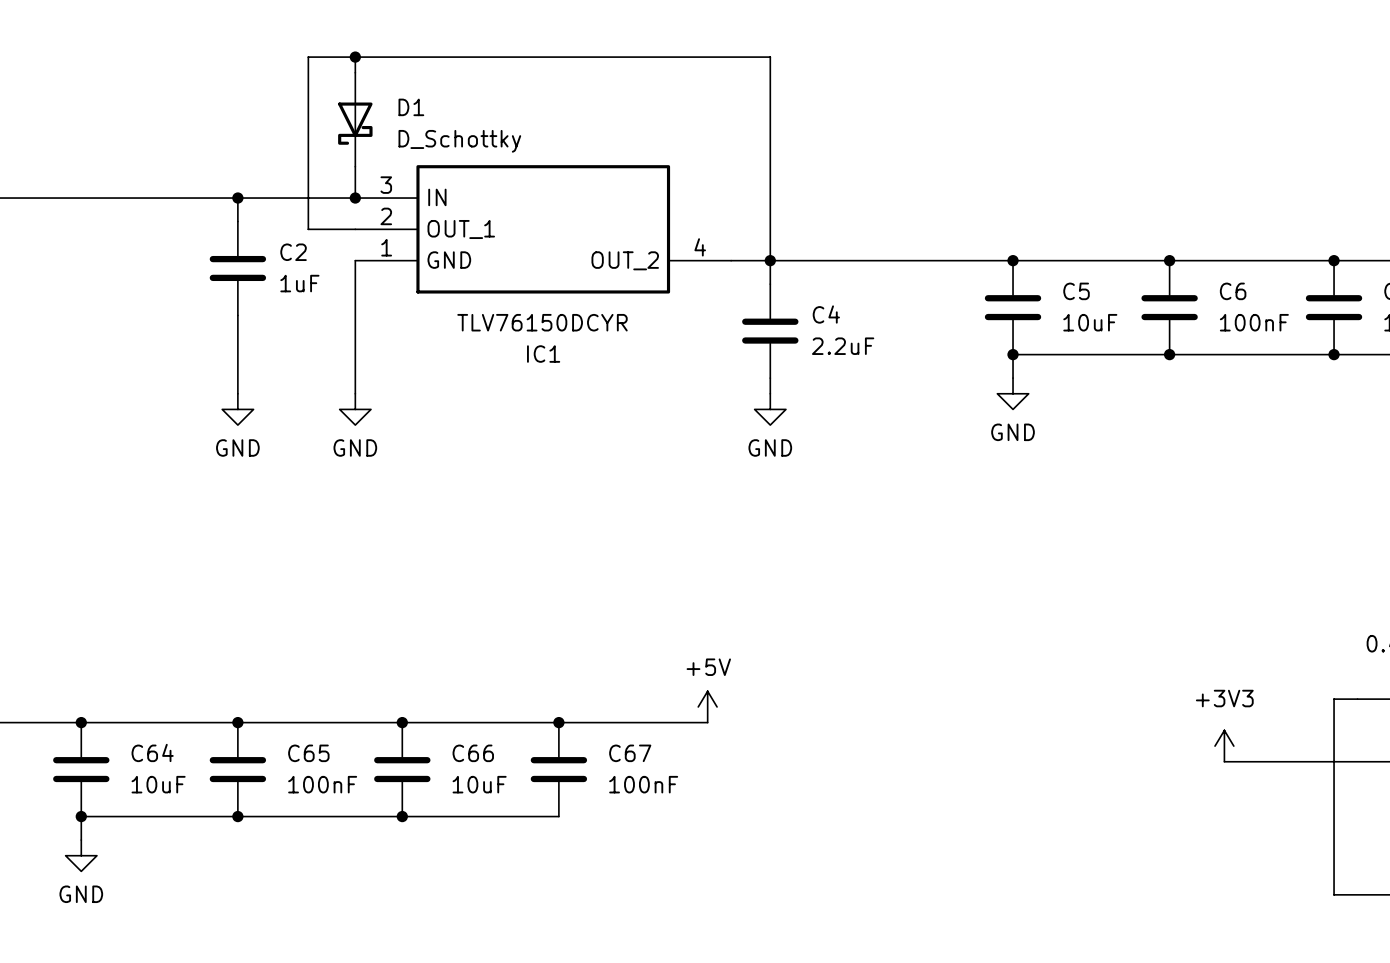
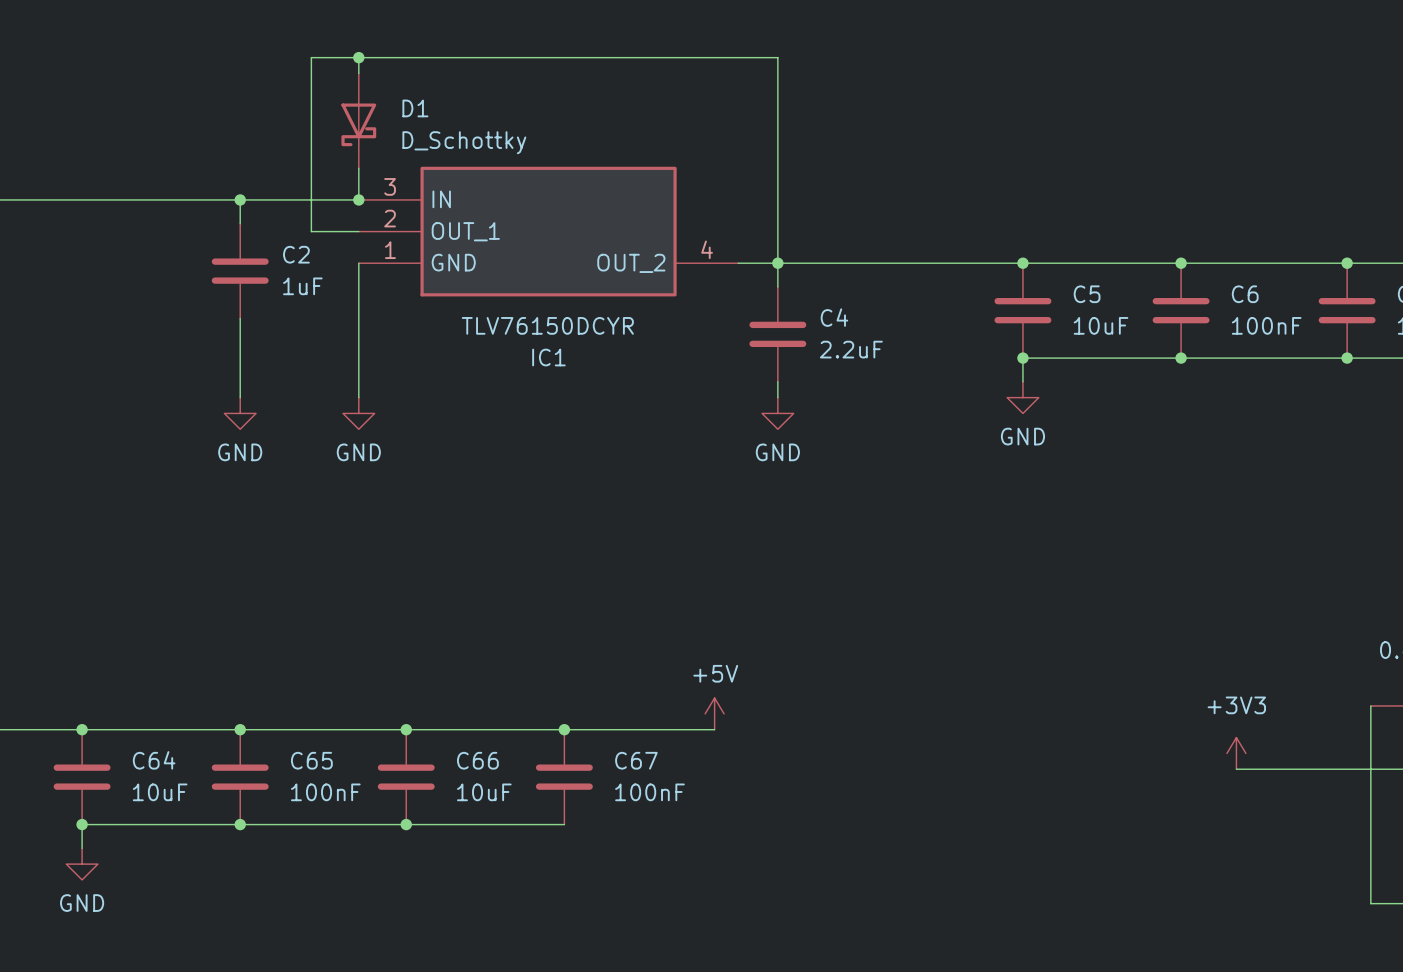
wire: (1357, 699) (1334, 699) (1334, 894) (1357, 894) -> (1370, 705) (1370, 903)

